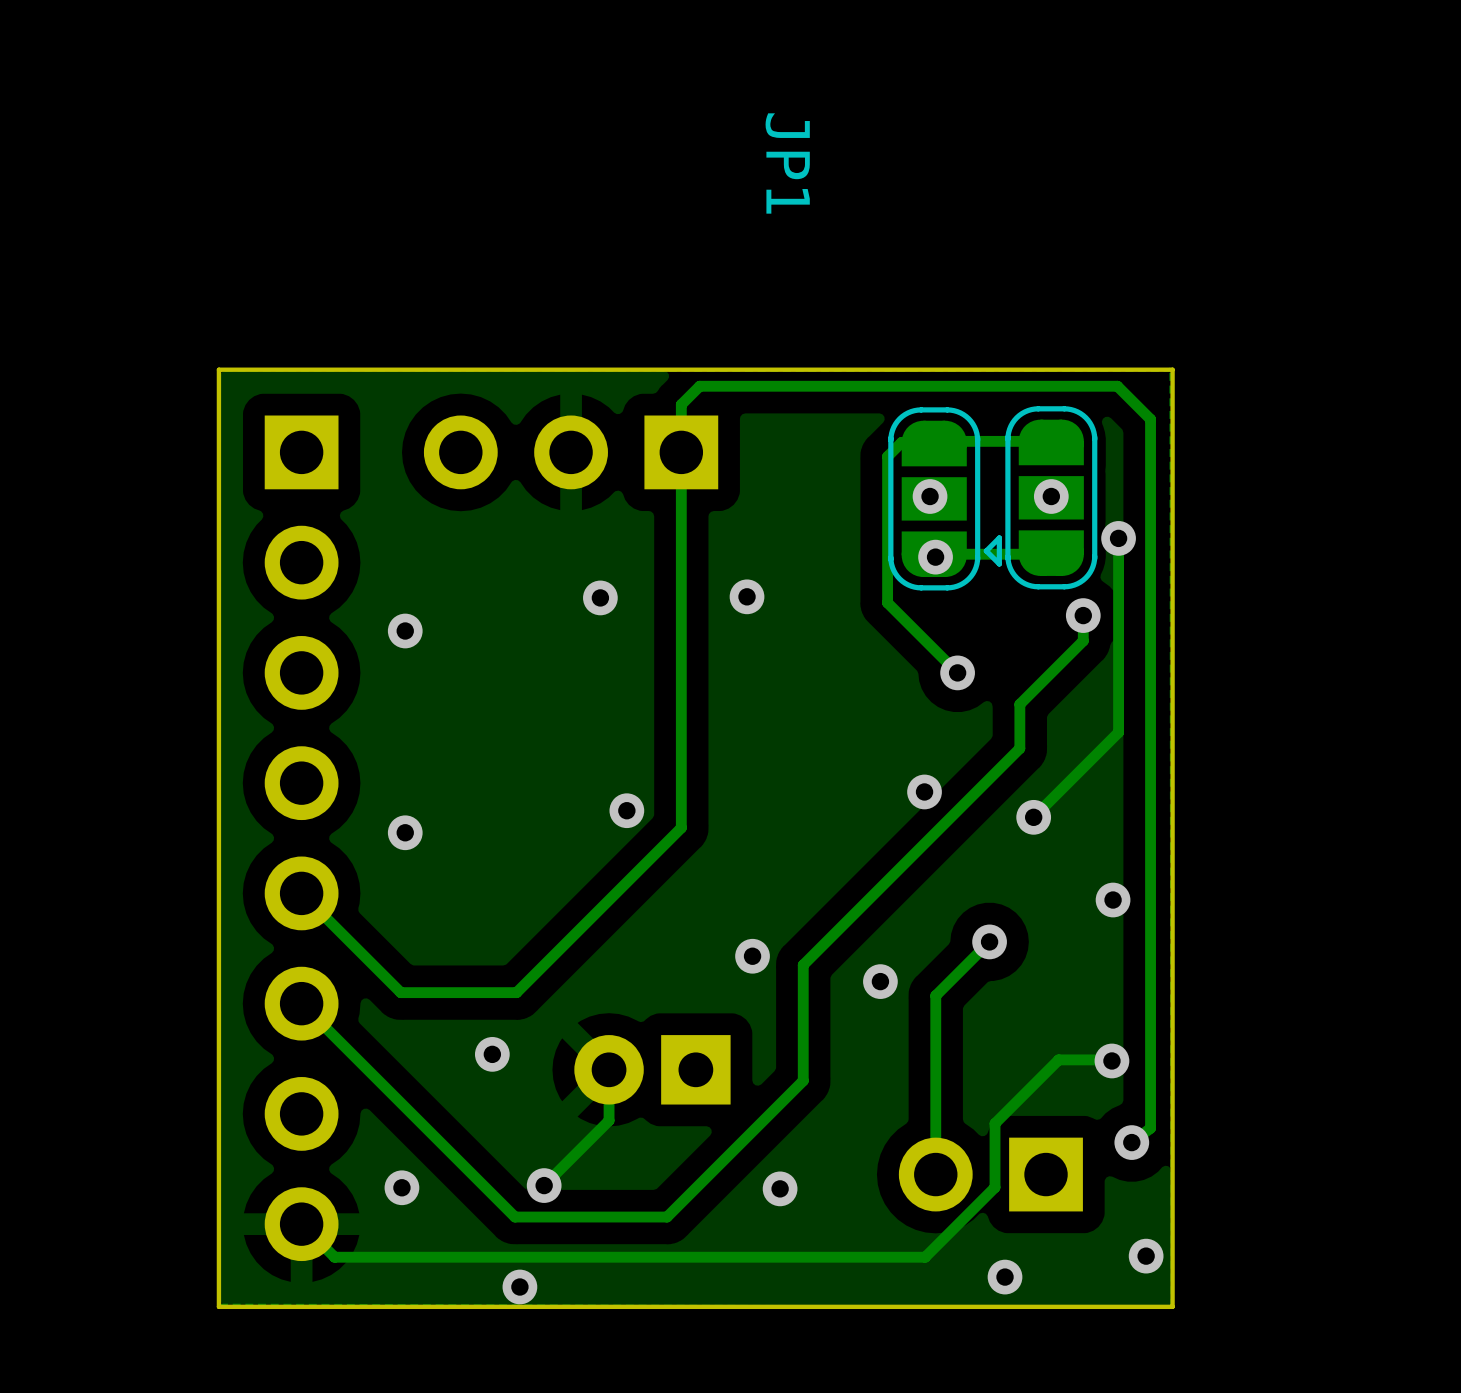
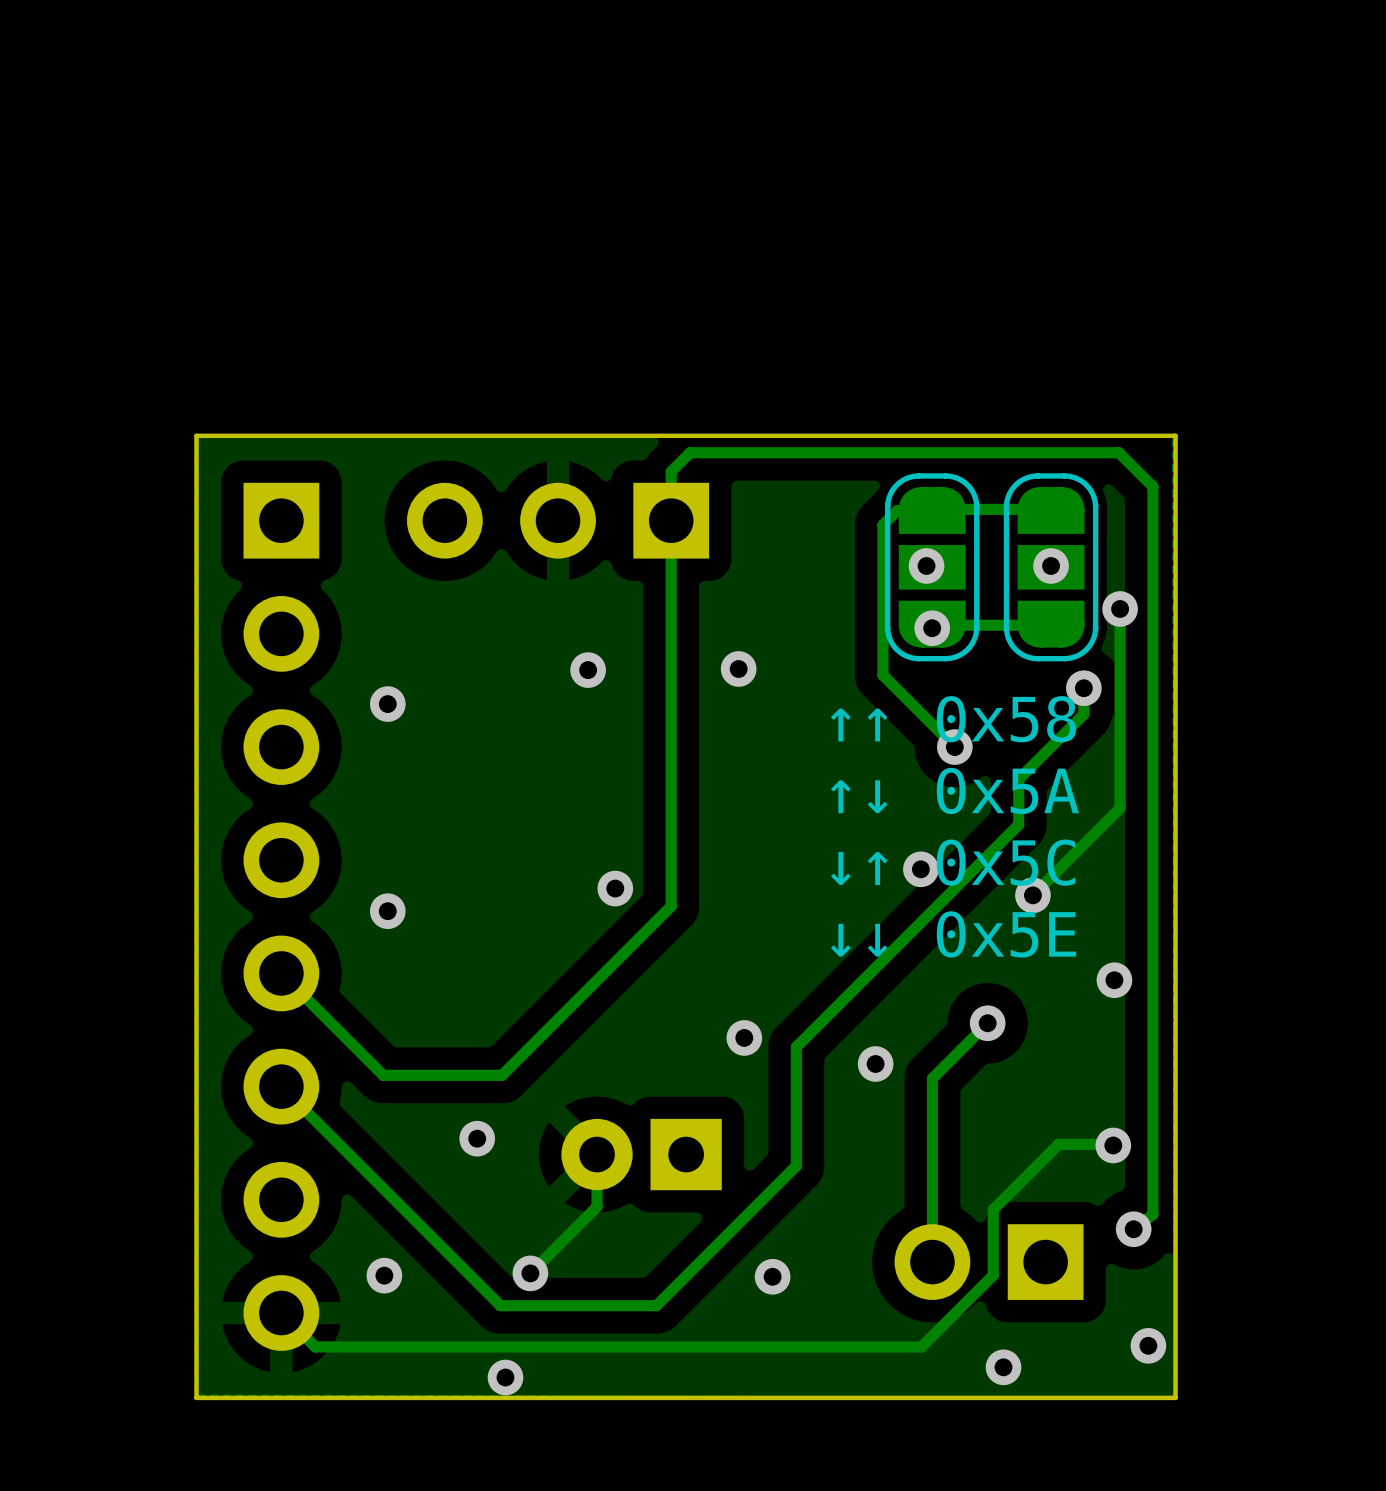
part: none -> (932, 567)
JP1: (945, 498) -> none
text: none -> ↑↑ 0x58 (953, 719)
text: none -> ↑↓ 0x5A (954, 790)
text: none -> ↓↑ 0x5C (953, 862)
text: none -> ↓↓ 0x5E (953, 934)

